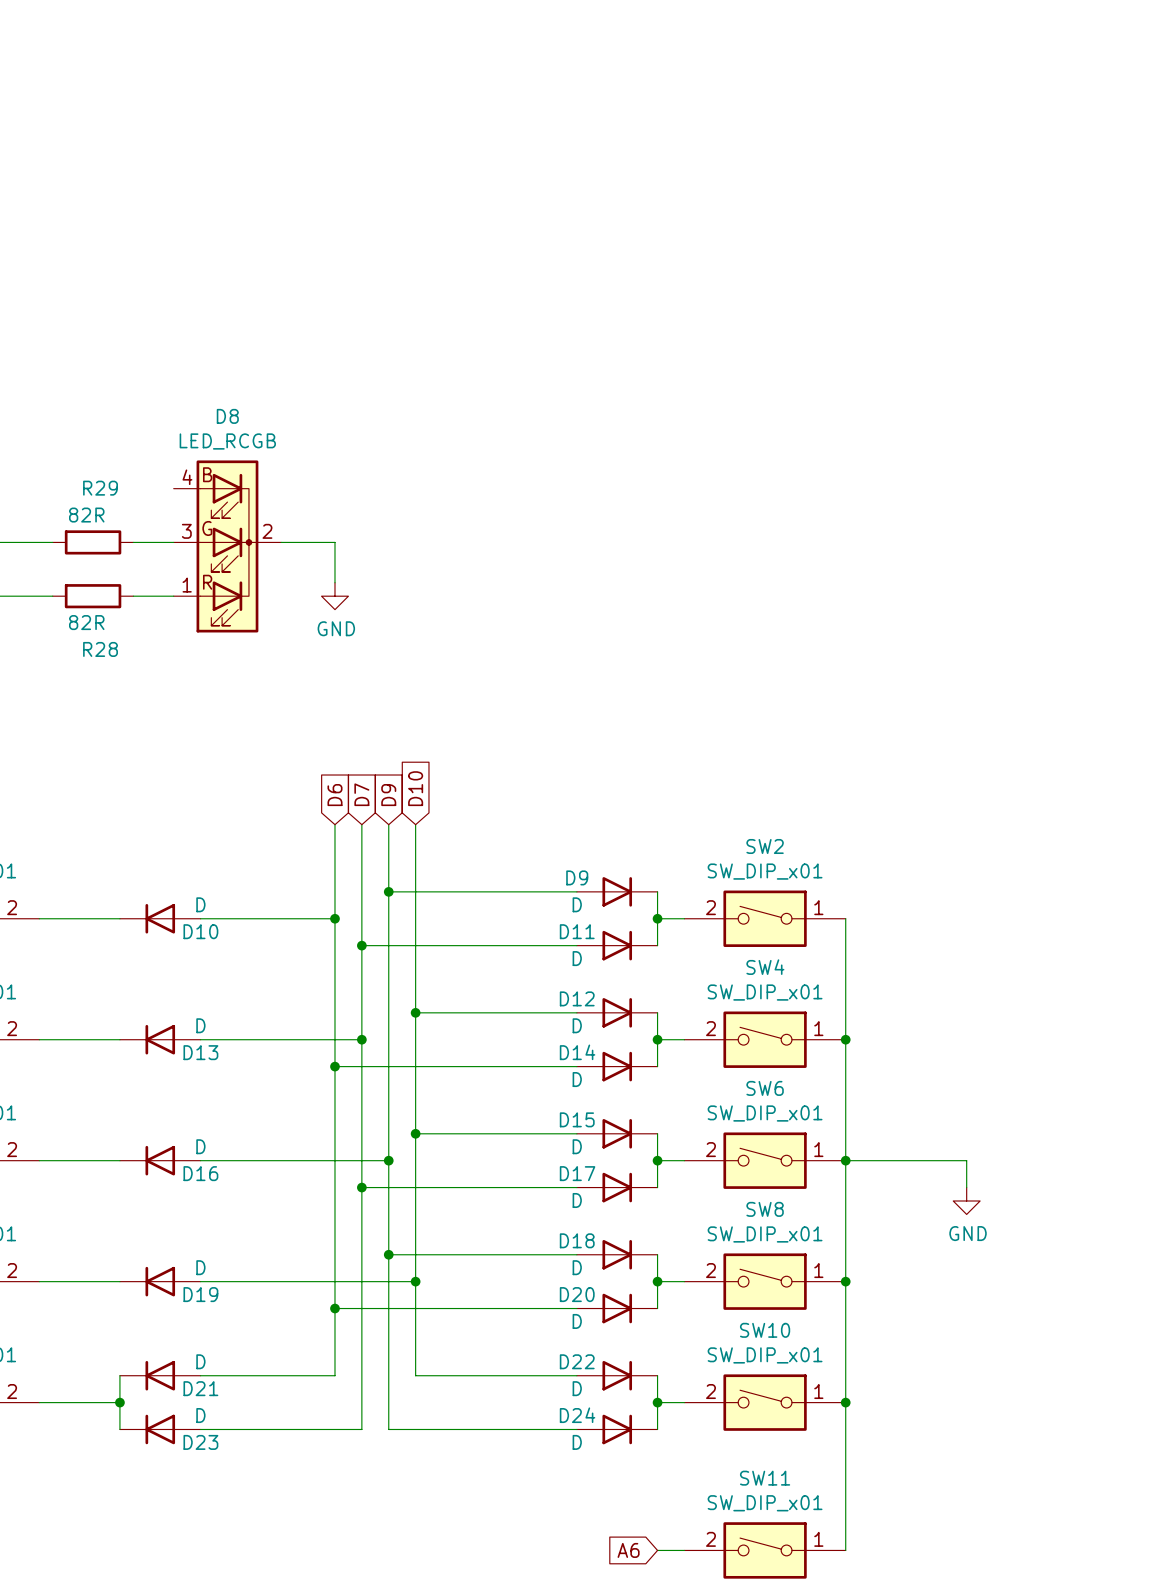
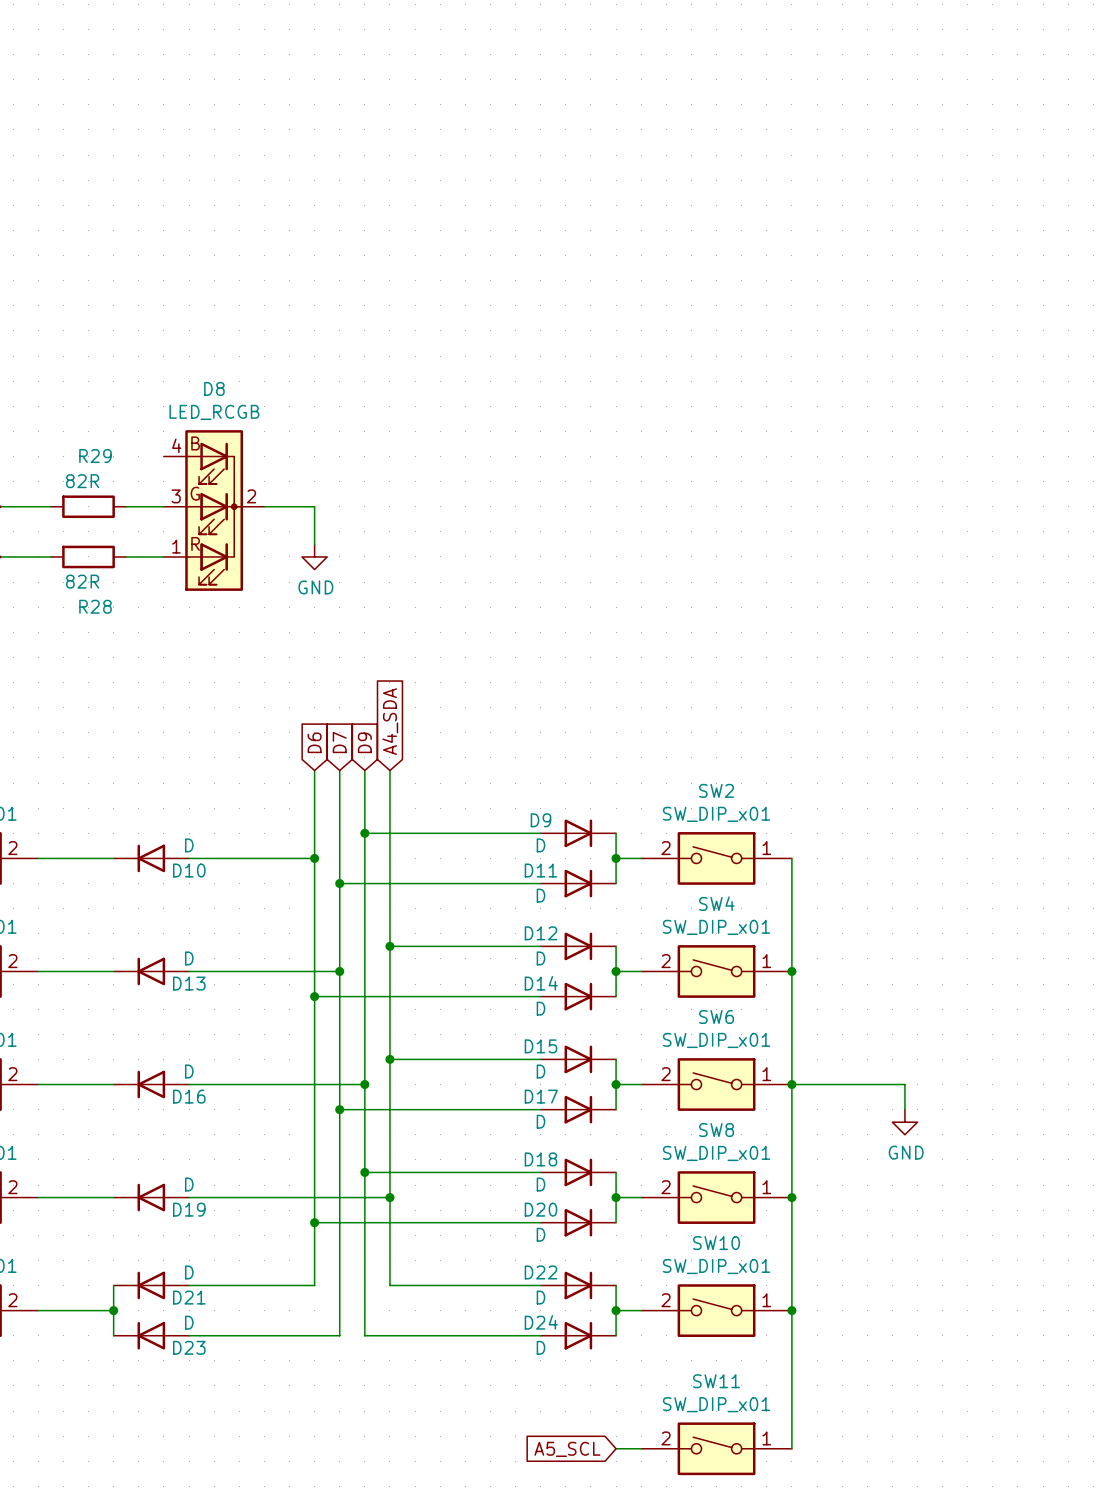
global label: D10 (415, 788) -> A4_SDA (390, 721)
global label: A6 (628, 1550) -> A5_SCL (567, 1449)

